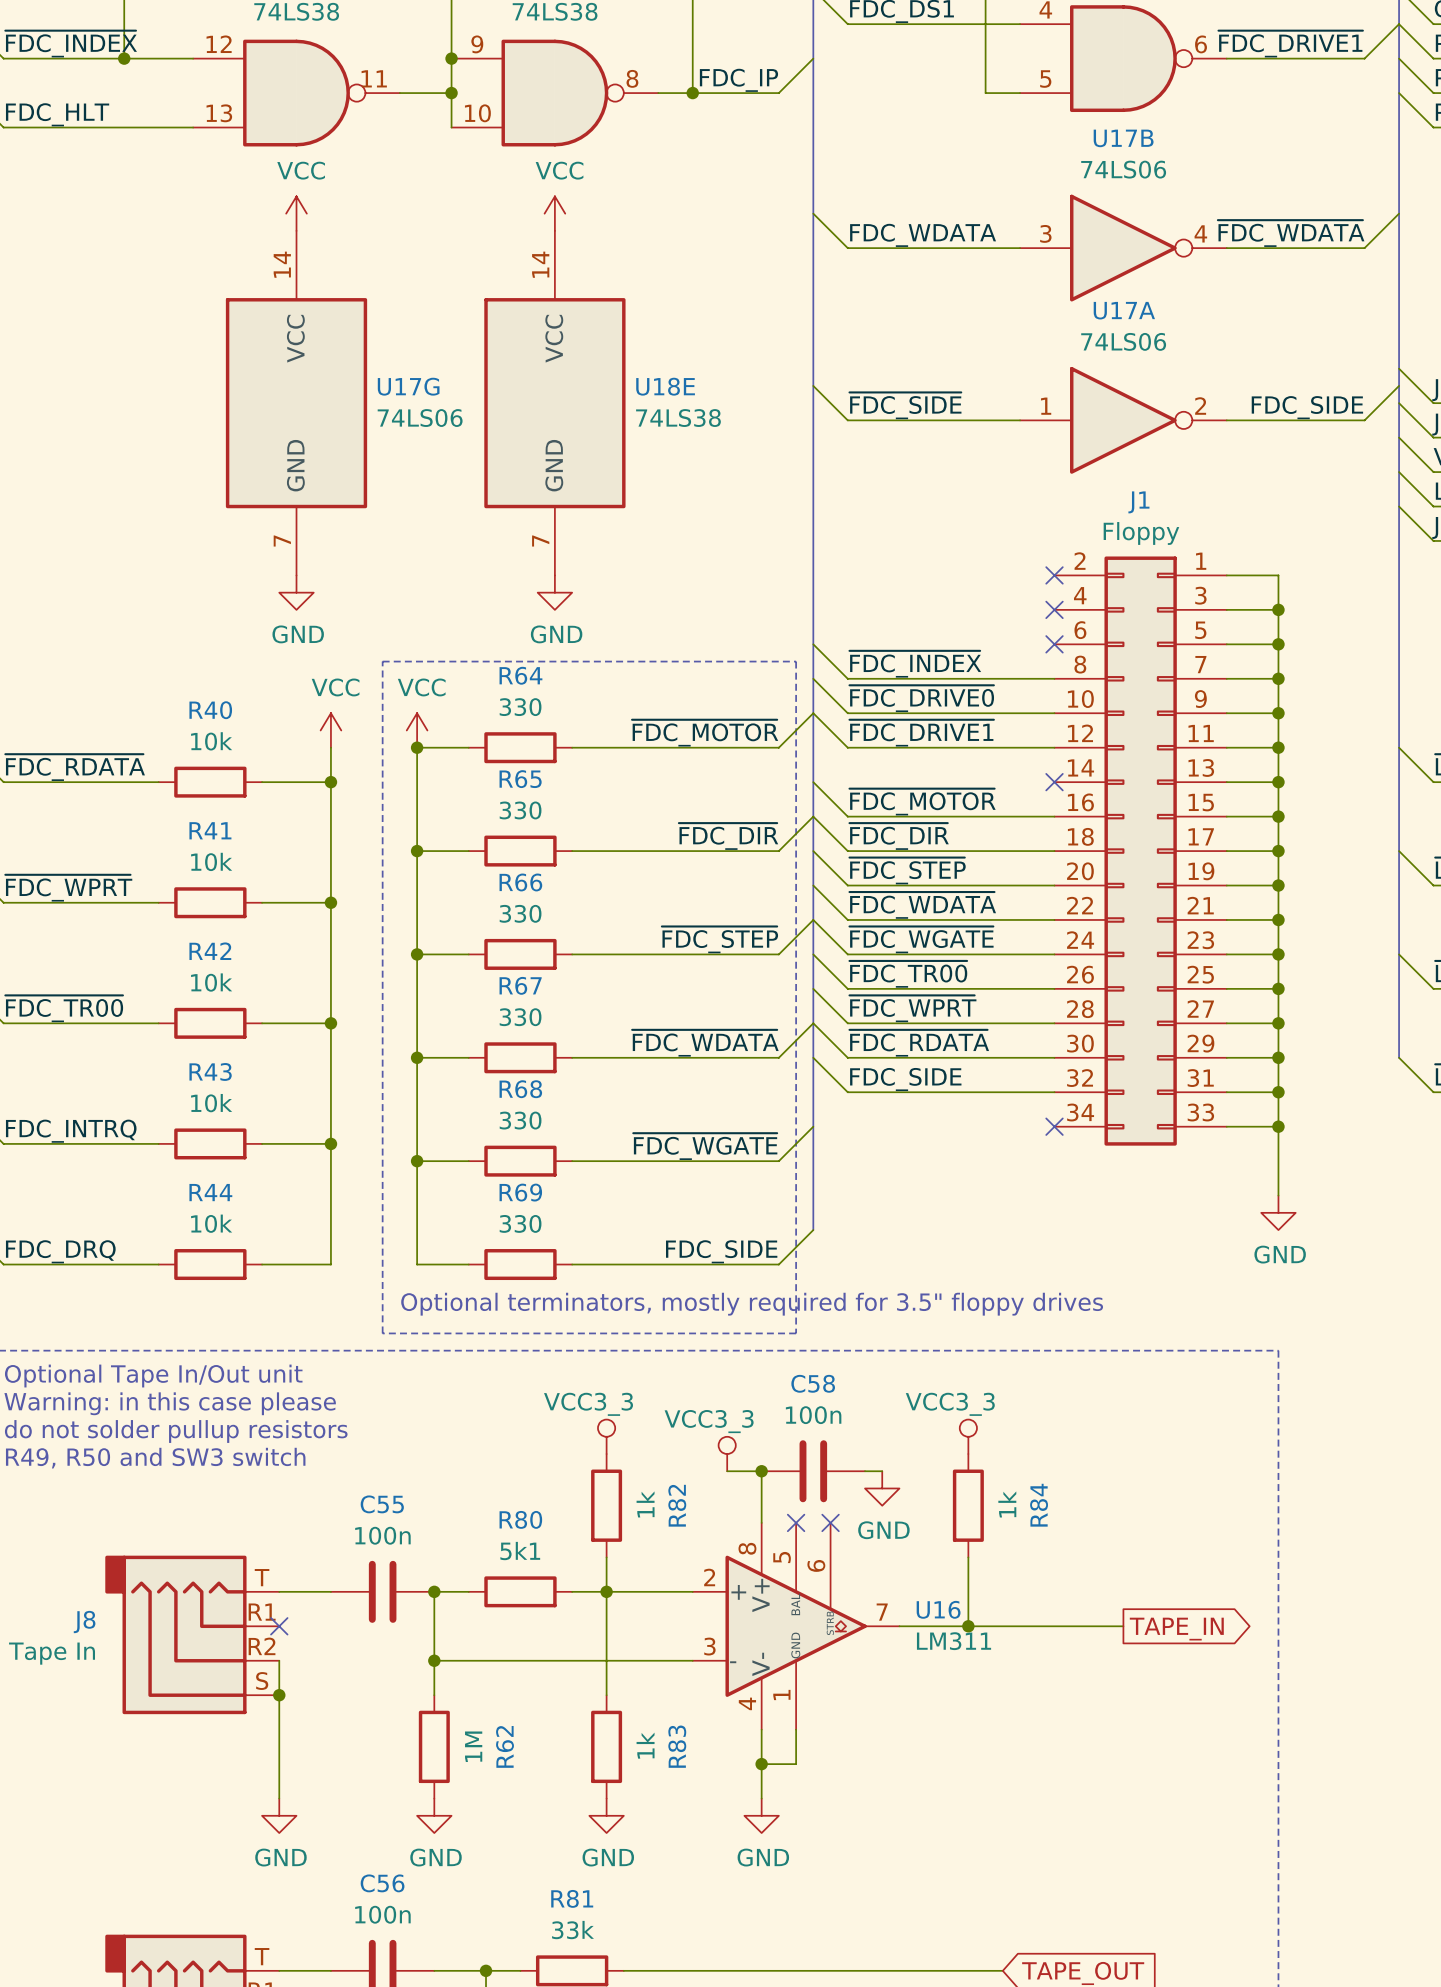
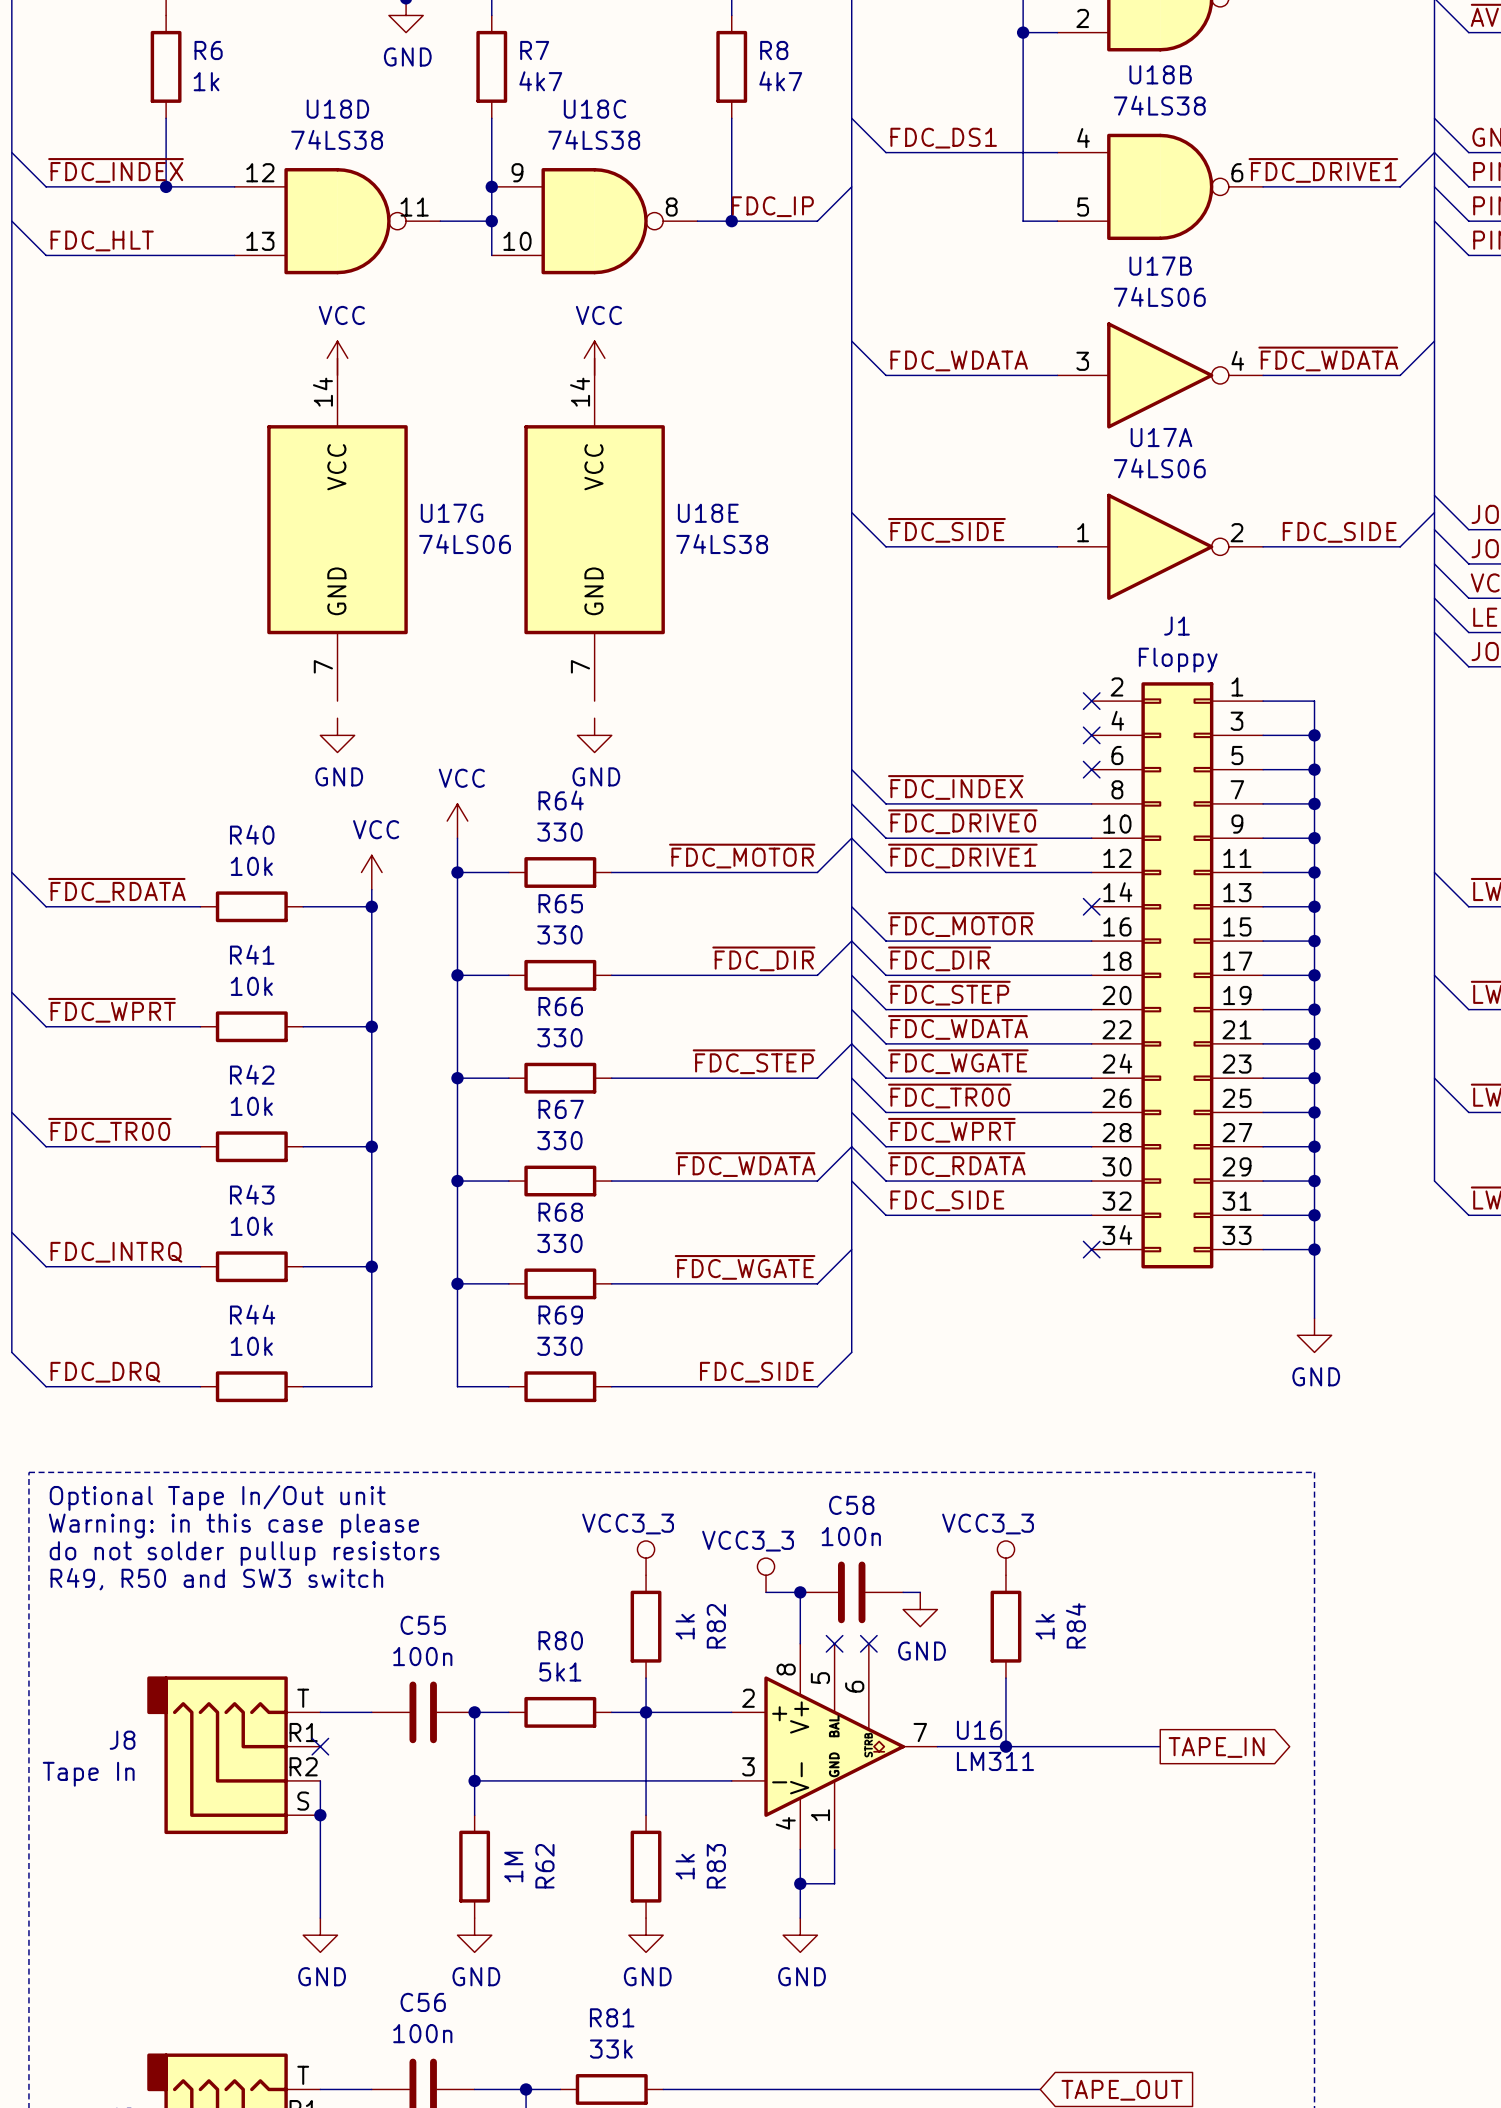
power symbol position: VCC (296, 213) -> VCC (337, 358)
power symbol position: VCC (554, 213) -> VCC (594, 358)
power symbol position: GND (296, 592) -> GND (337, 735)
power symbol position: GND (554, 592) -> GND (594, 735)
line: (382, 661) (382, 1333) (796, 1333) (796, 661) (382, 661) -> none
power symbol position: VCC (330, 730) -> VCC (371, 872)
power symbol position: VCC (417, 730) -> VCC (457, 821)
text: Optional terminators, mostly required for 3.5" floppy drives (752, 1304) -> none

